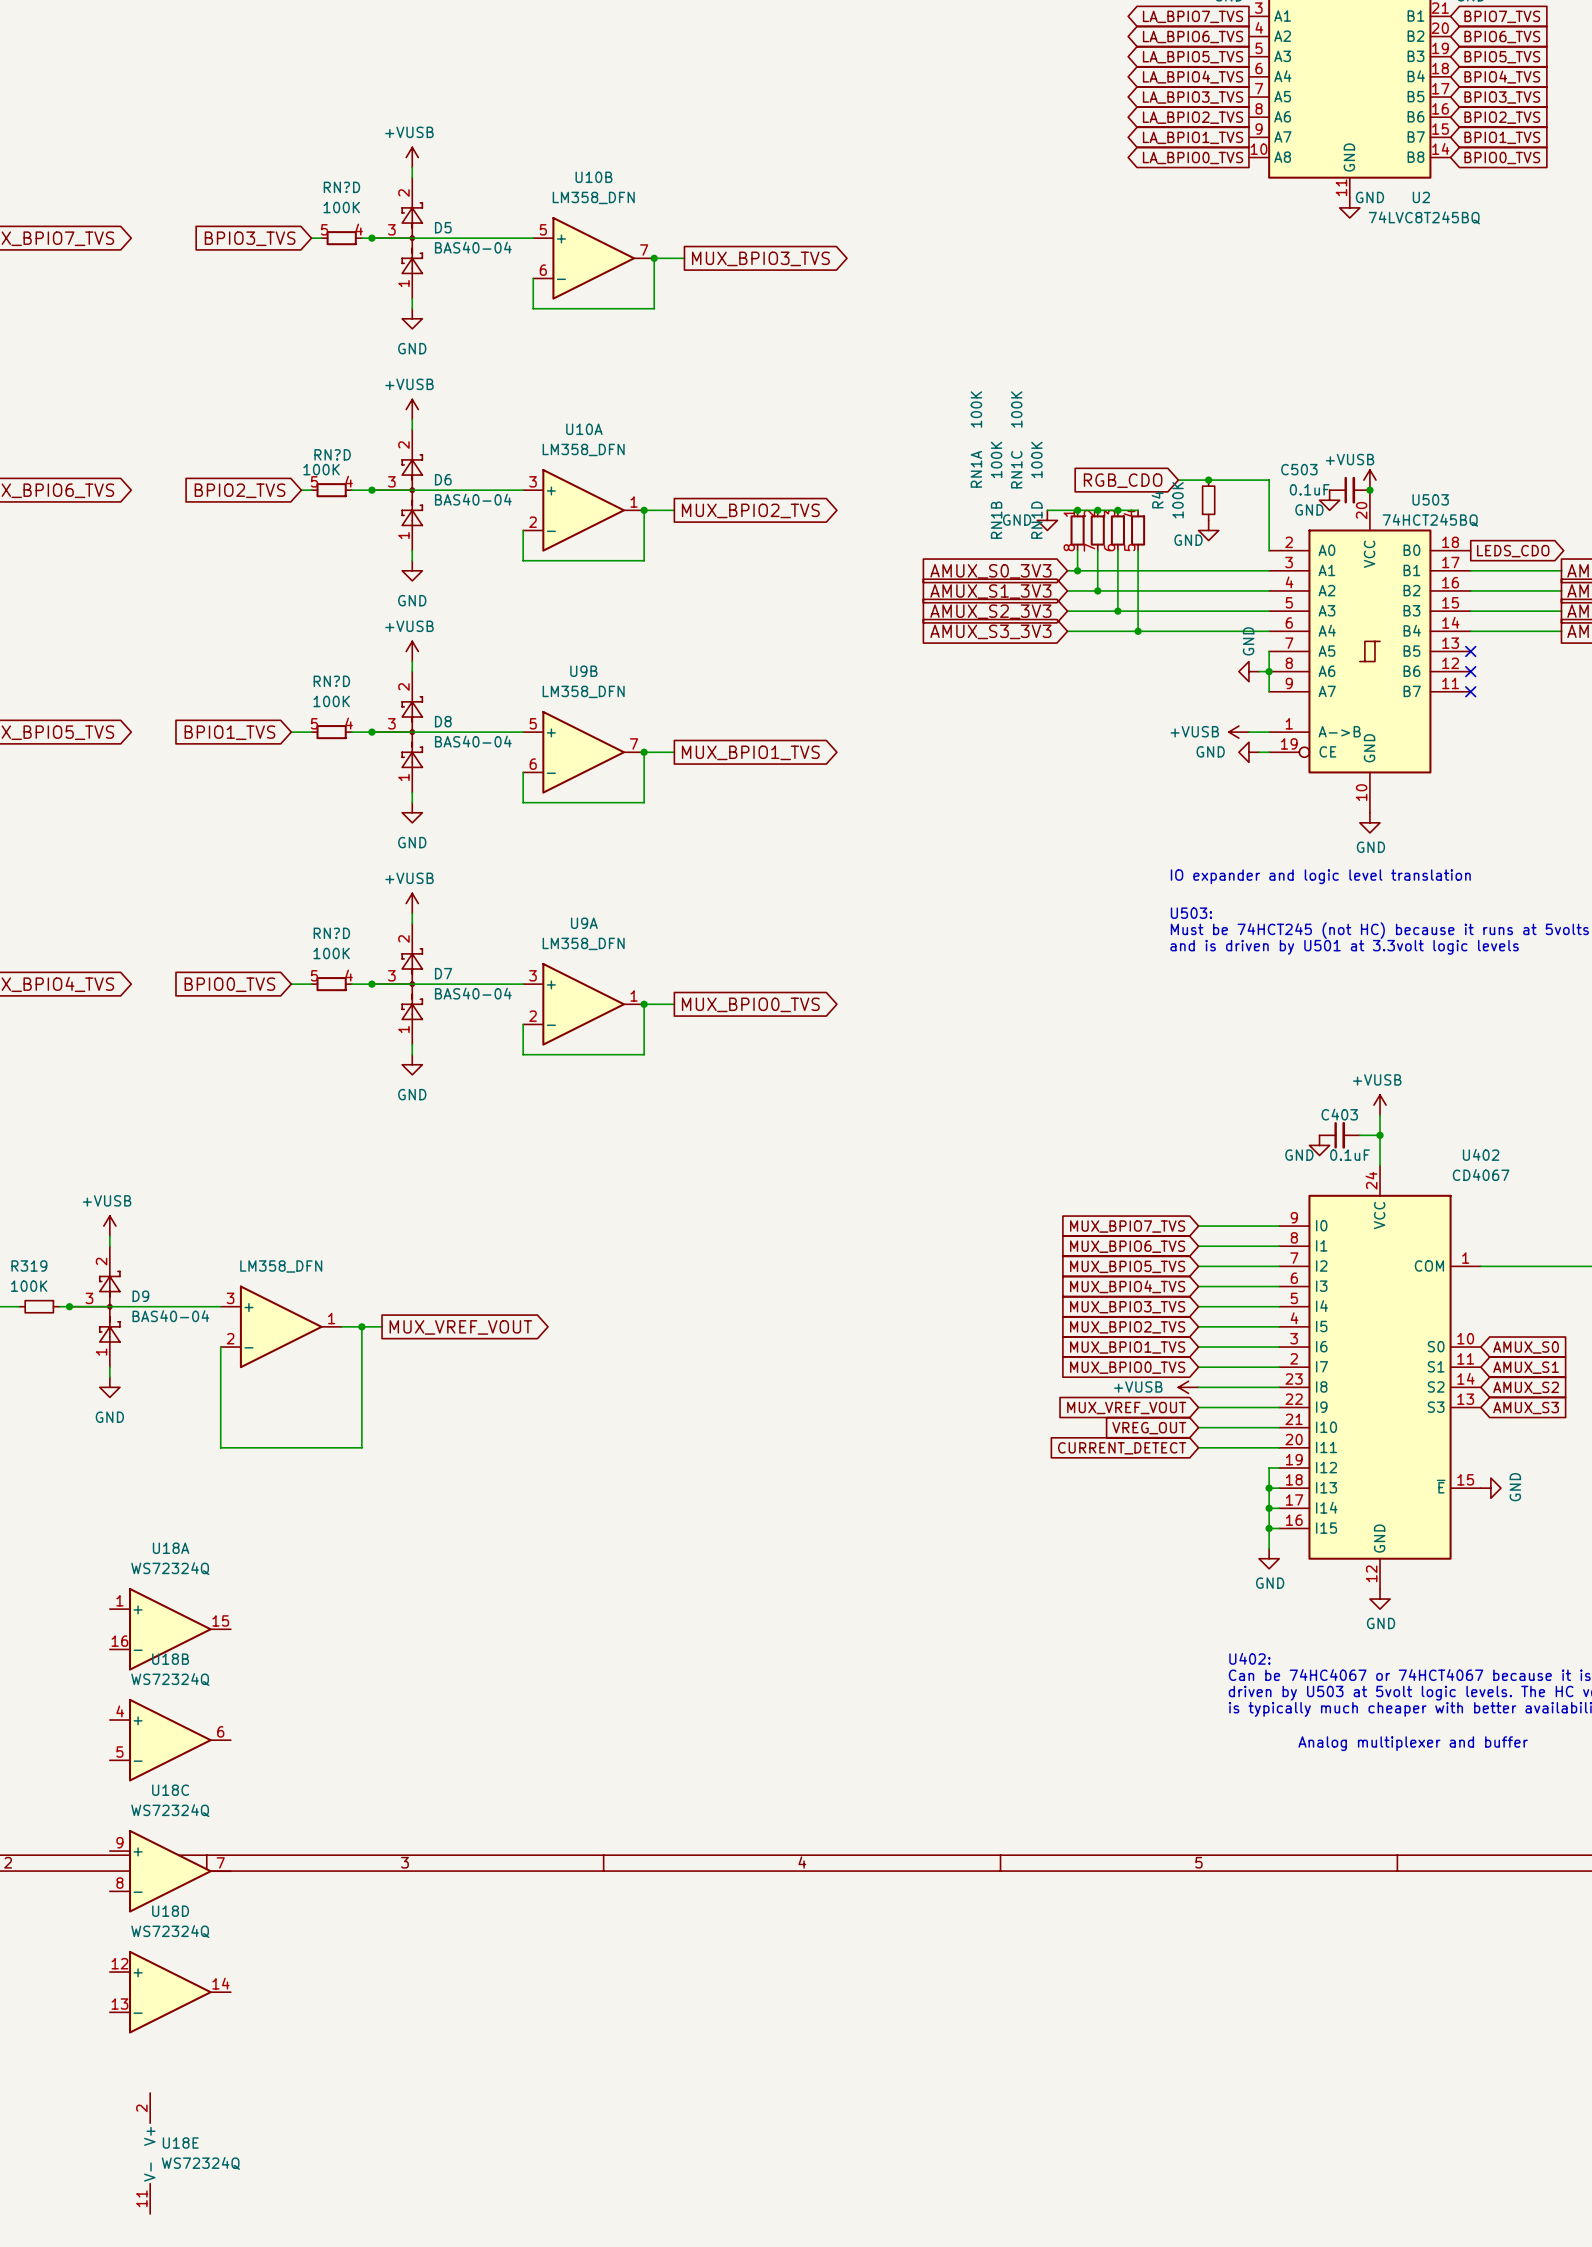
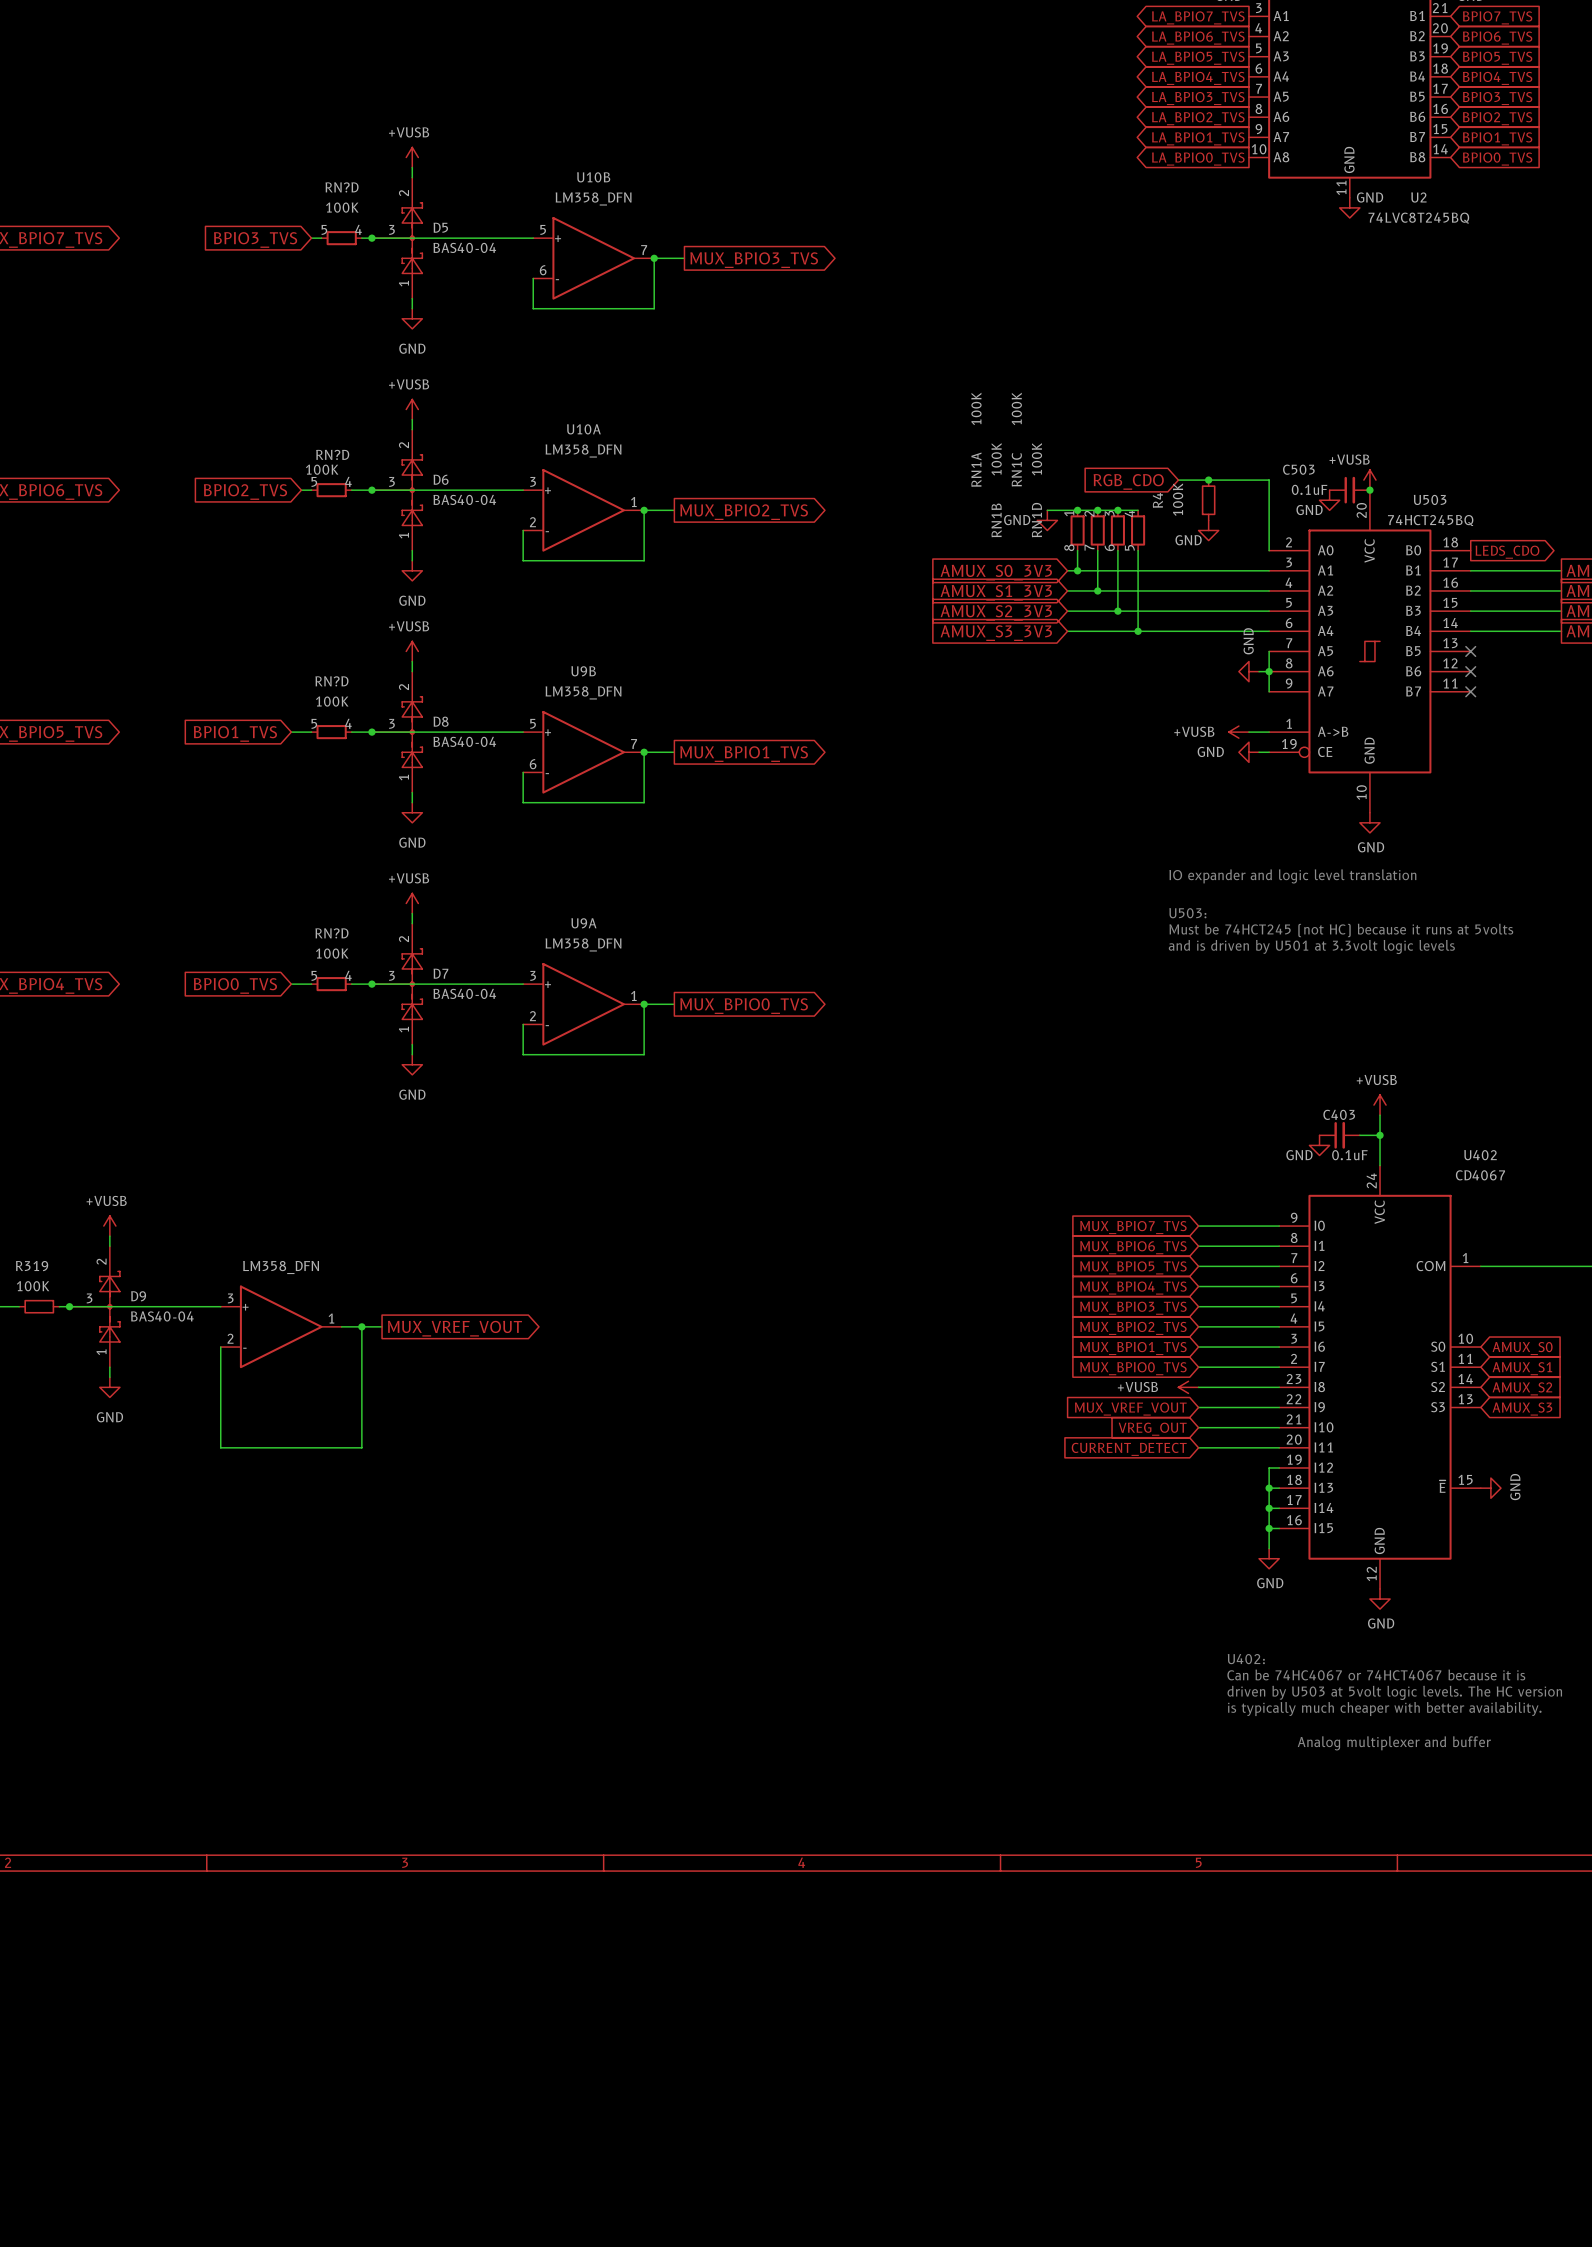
U18A: WS72324Q (170, 1629) -> none
U18B: WS72324Q (170, 1740) -> none
U18C: WS72324Q (170, 1871) -> none
U18D: WS72324Q (170, 1992) -> none
U18E: WS72324Q (150, 2153) -> none

